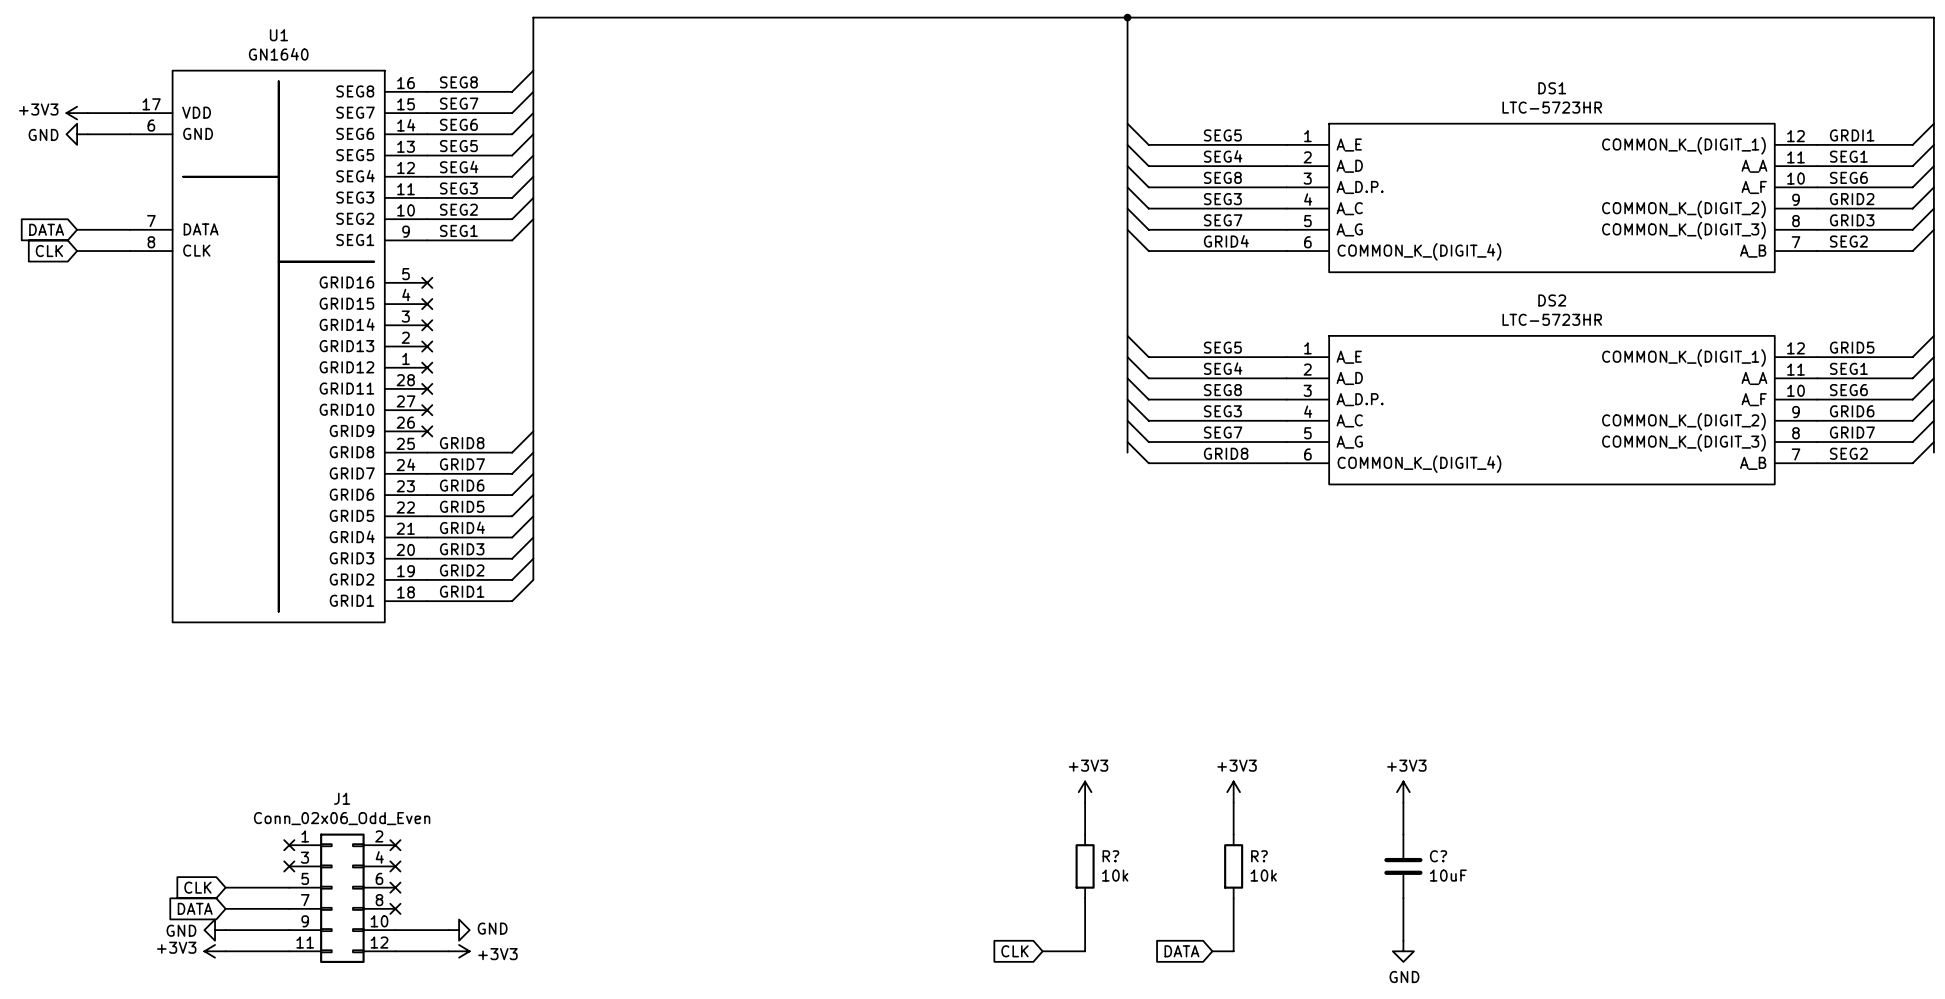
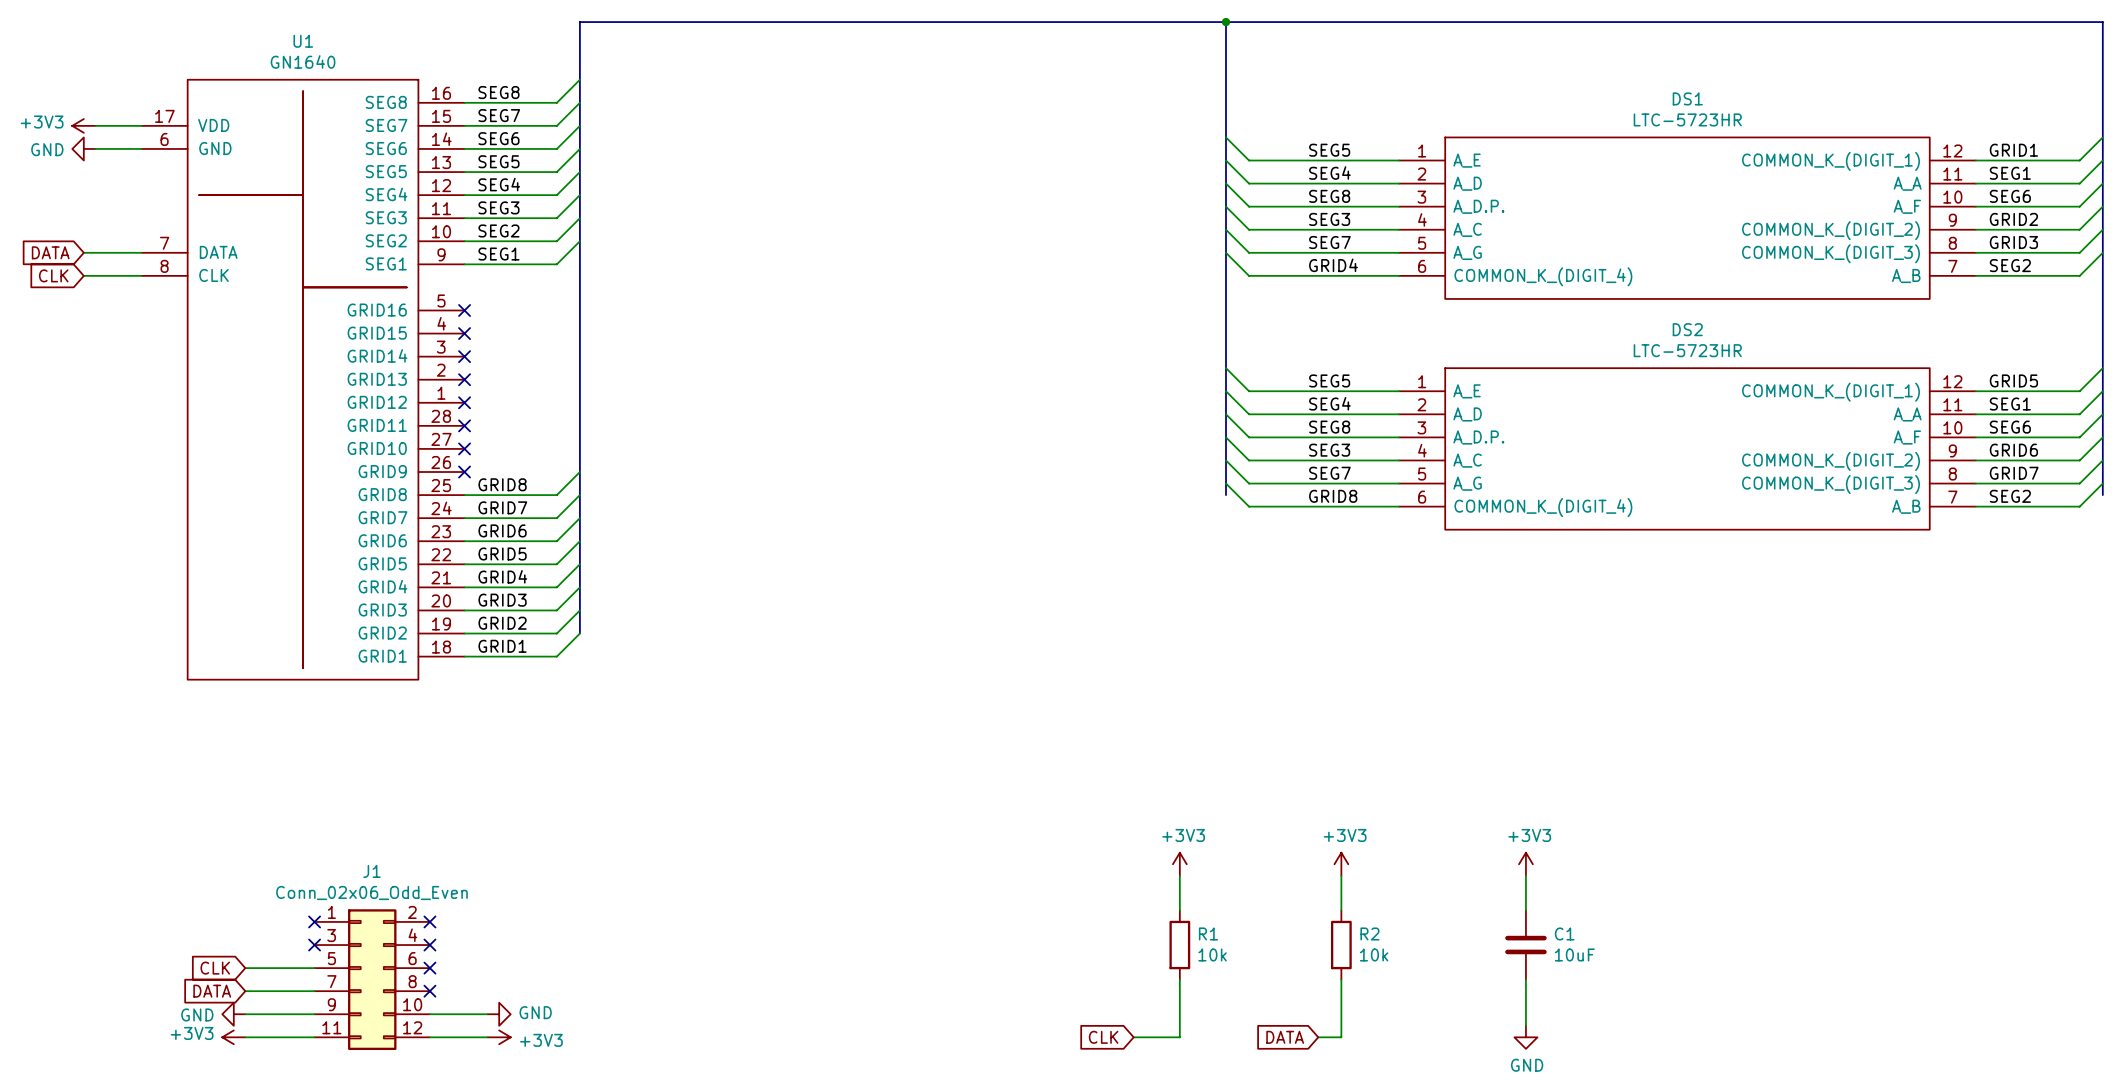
label: GRDI1 (1852, 135) -> GRID1 (2013, 150)
R? name: R? (1110, 856) -> R1 (1208, 933)
R? name: R? (1259, 856) -> R2 (1369, 933)
C? name: C? (1438, 856) -> C1 (1564, 933)

